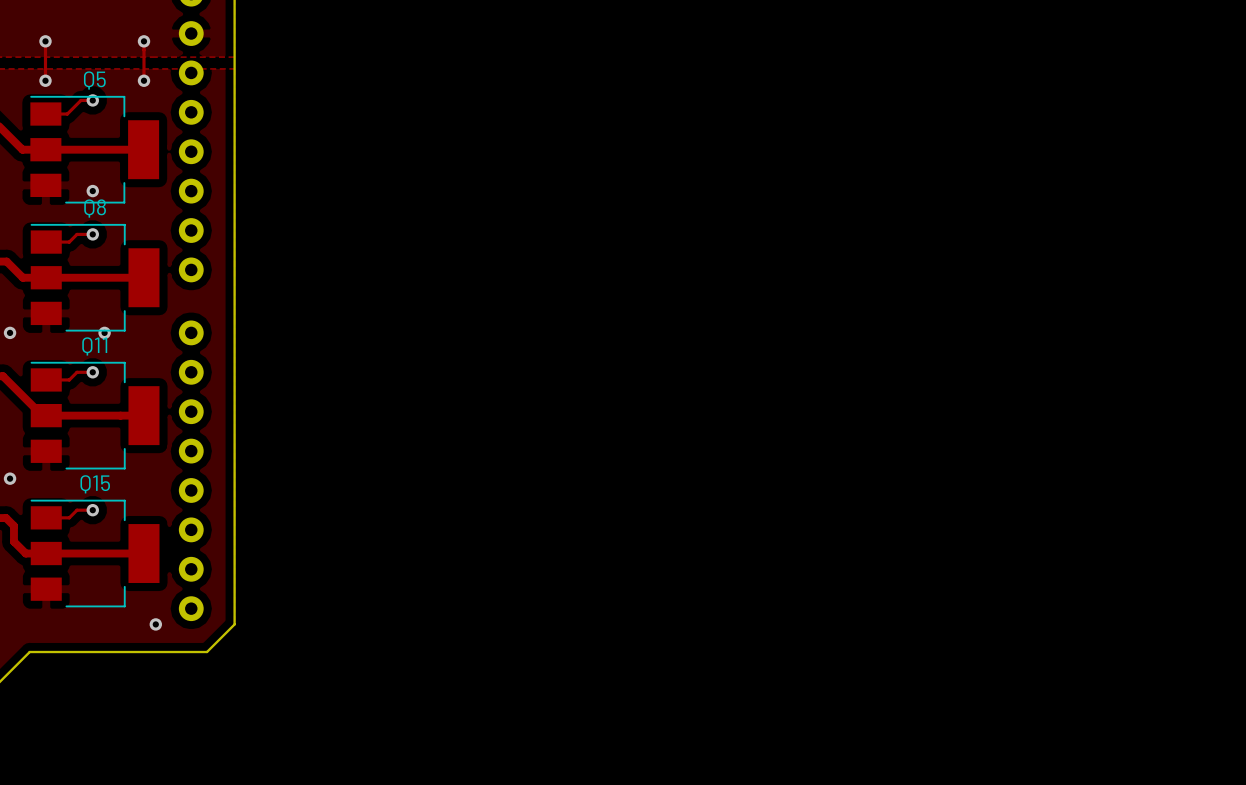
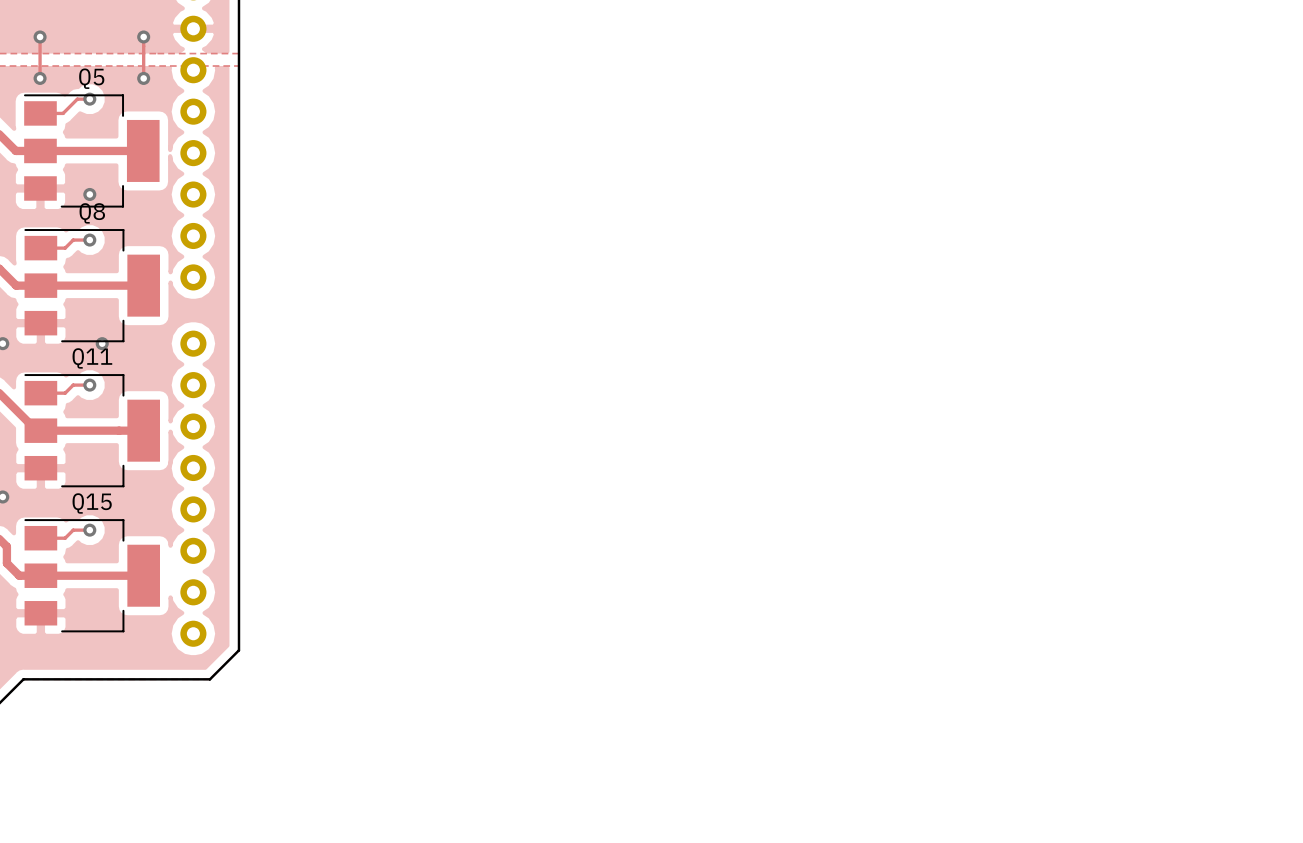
via: (155, 624) -> none

